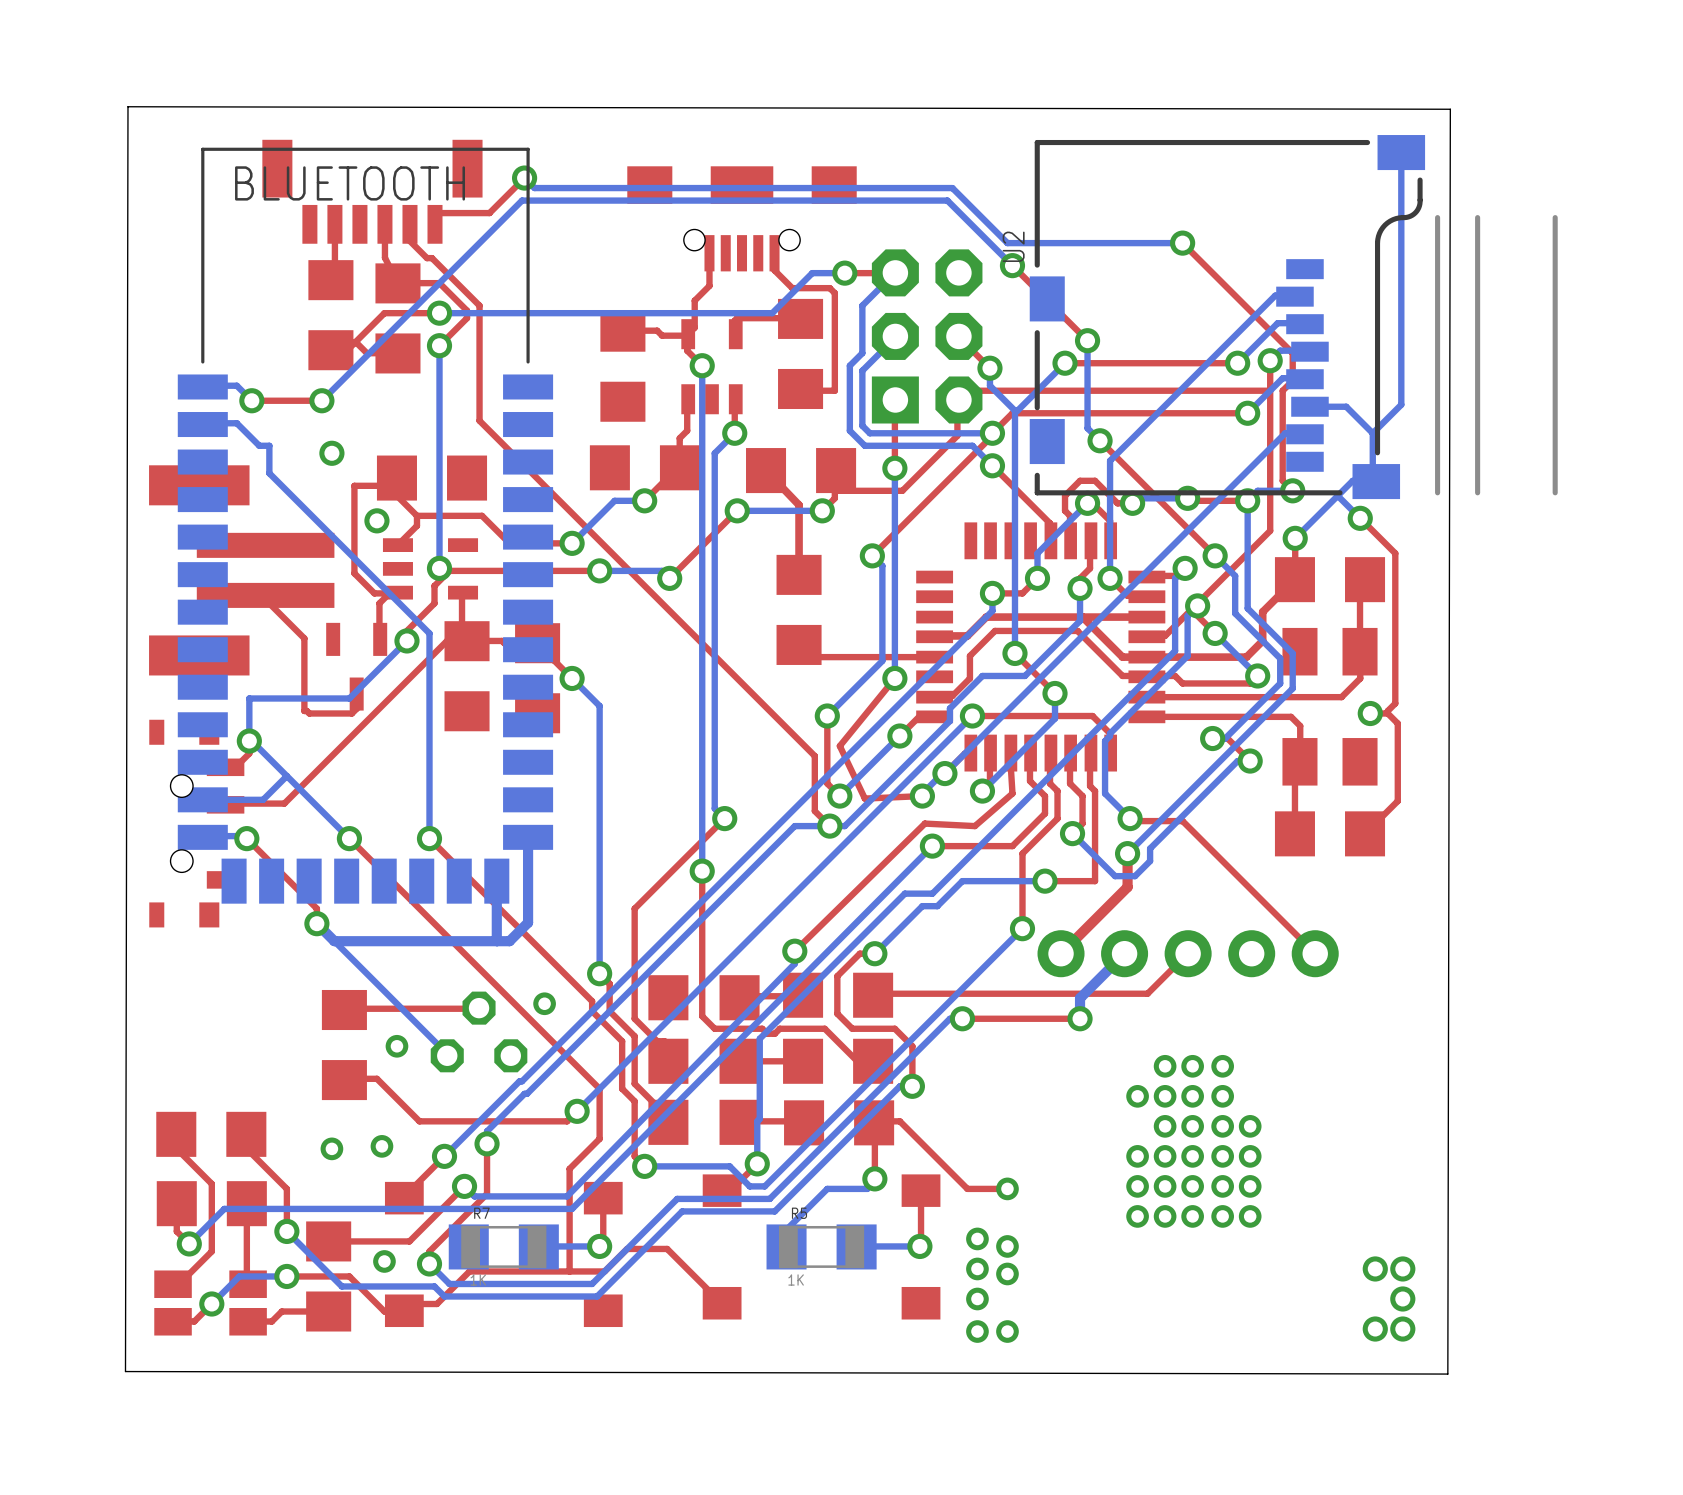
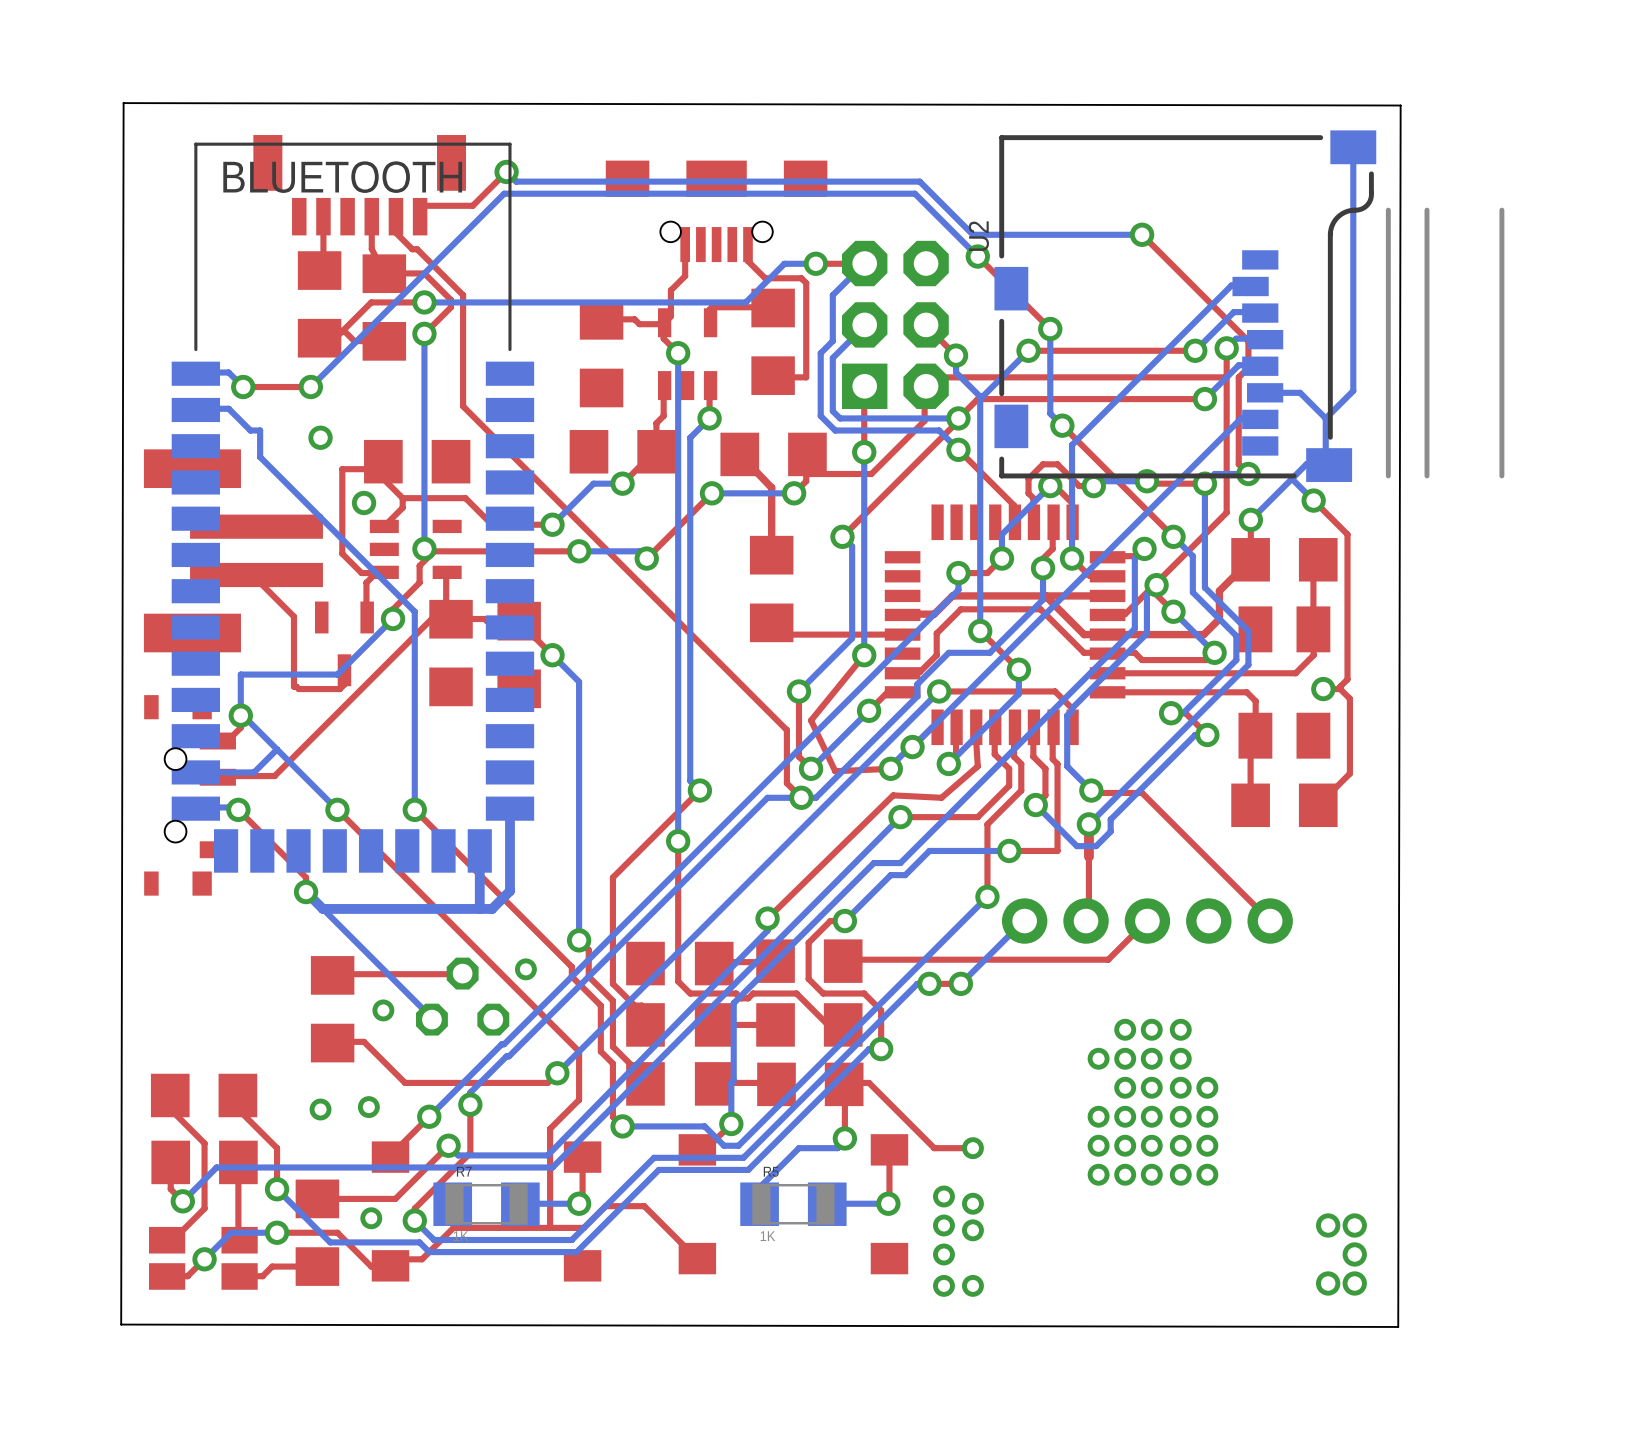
top track: (1127, 887) (1061, 953) -> (1088, 856) (1088, 918) (1086, 921)
bottom track: none -> (1024, 921) (960, 983)
bottom track: (1124, 953) (1080, 998) (1080, 1018) -> none
top track: (1080, 1018) (994, 1018) -> none
via position: (1080, 1018) -> (960, 983)

